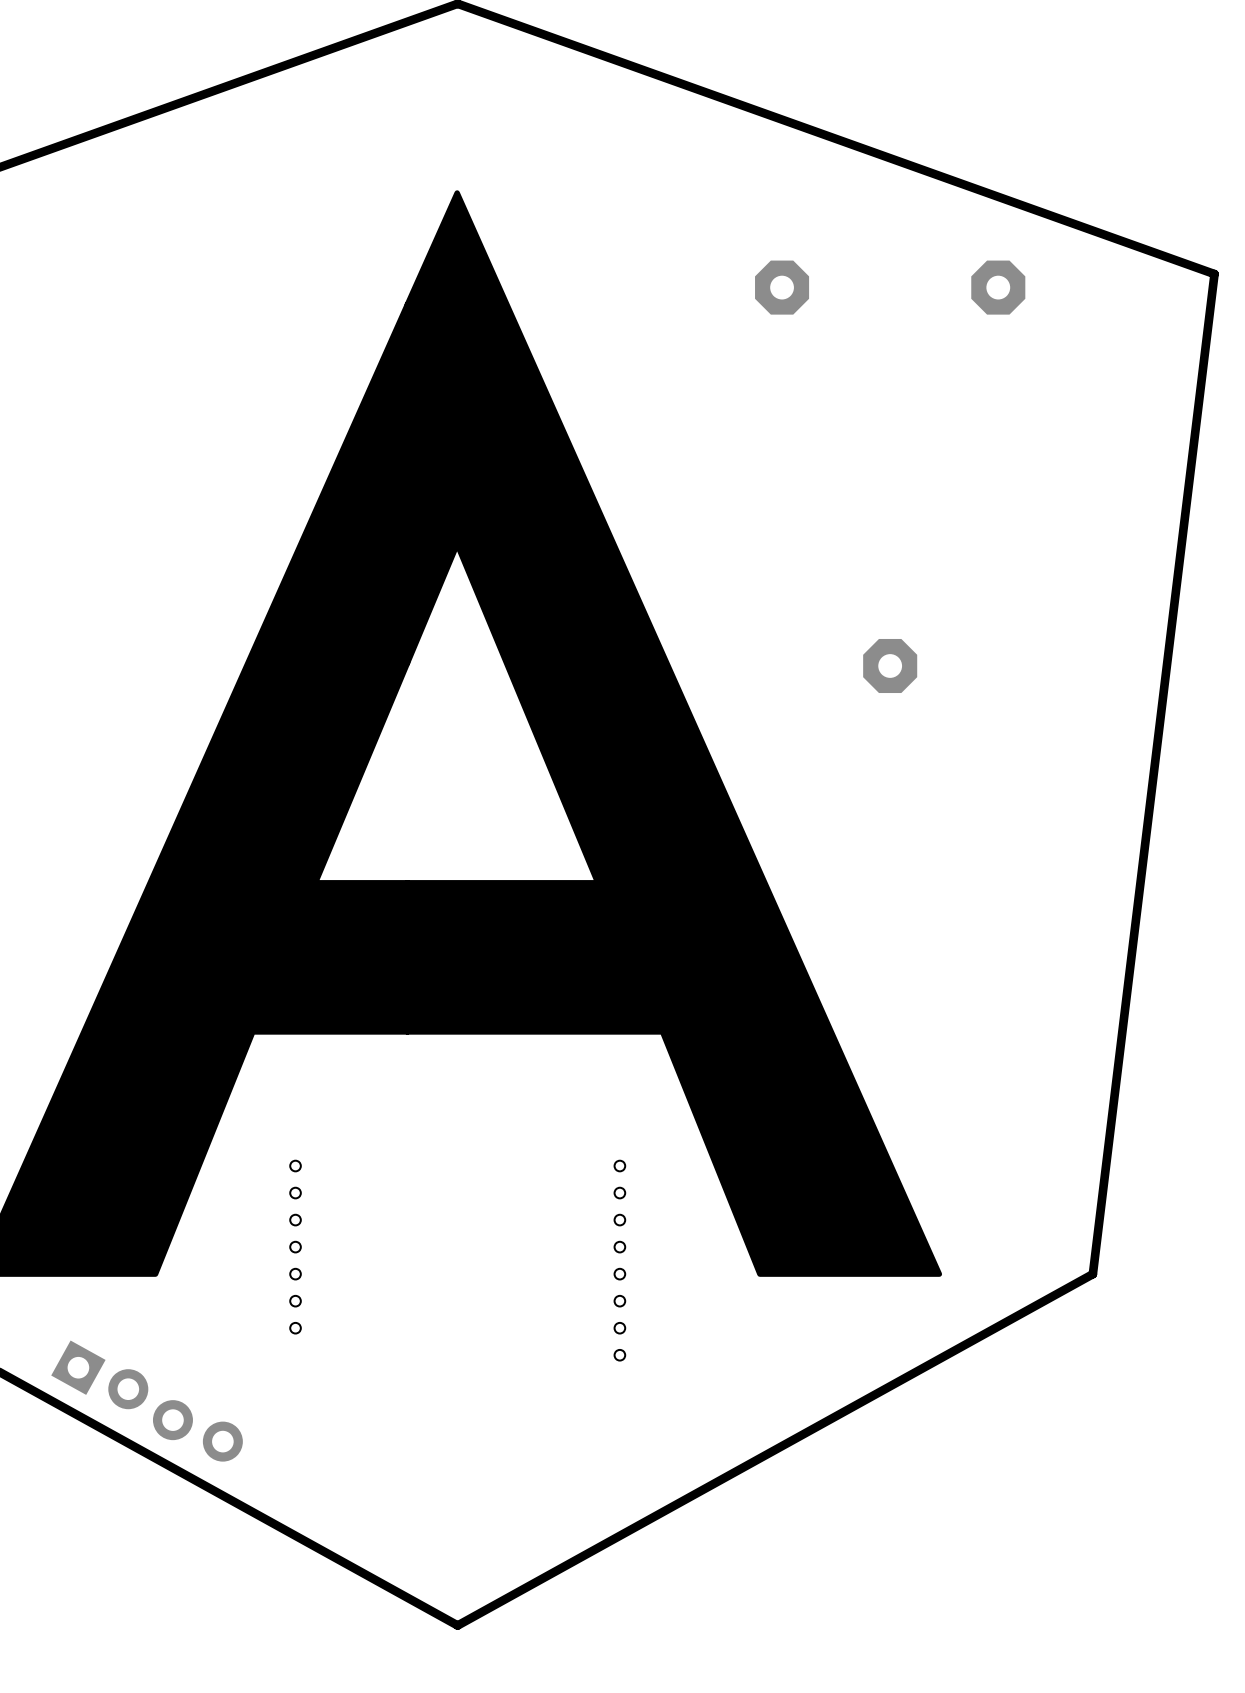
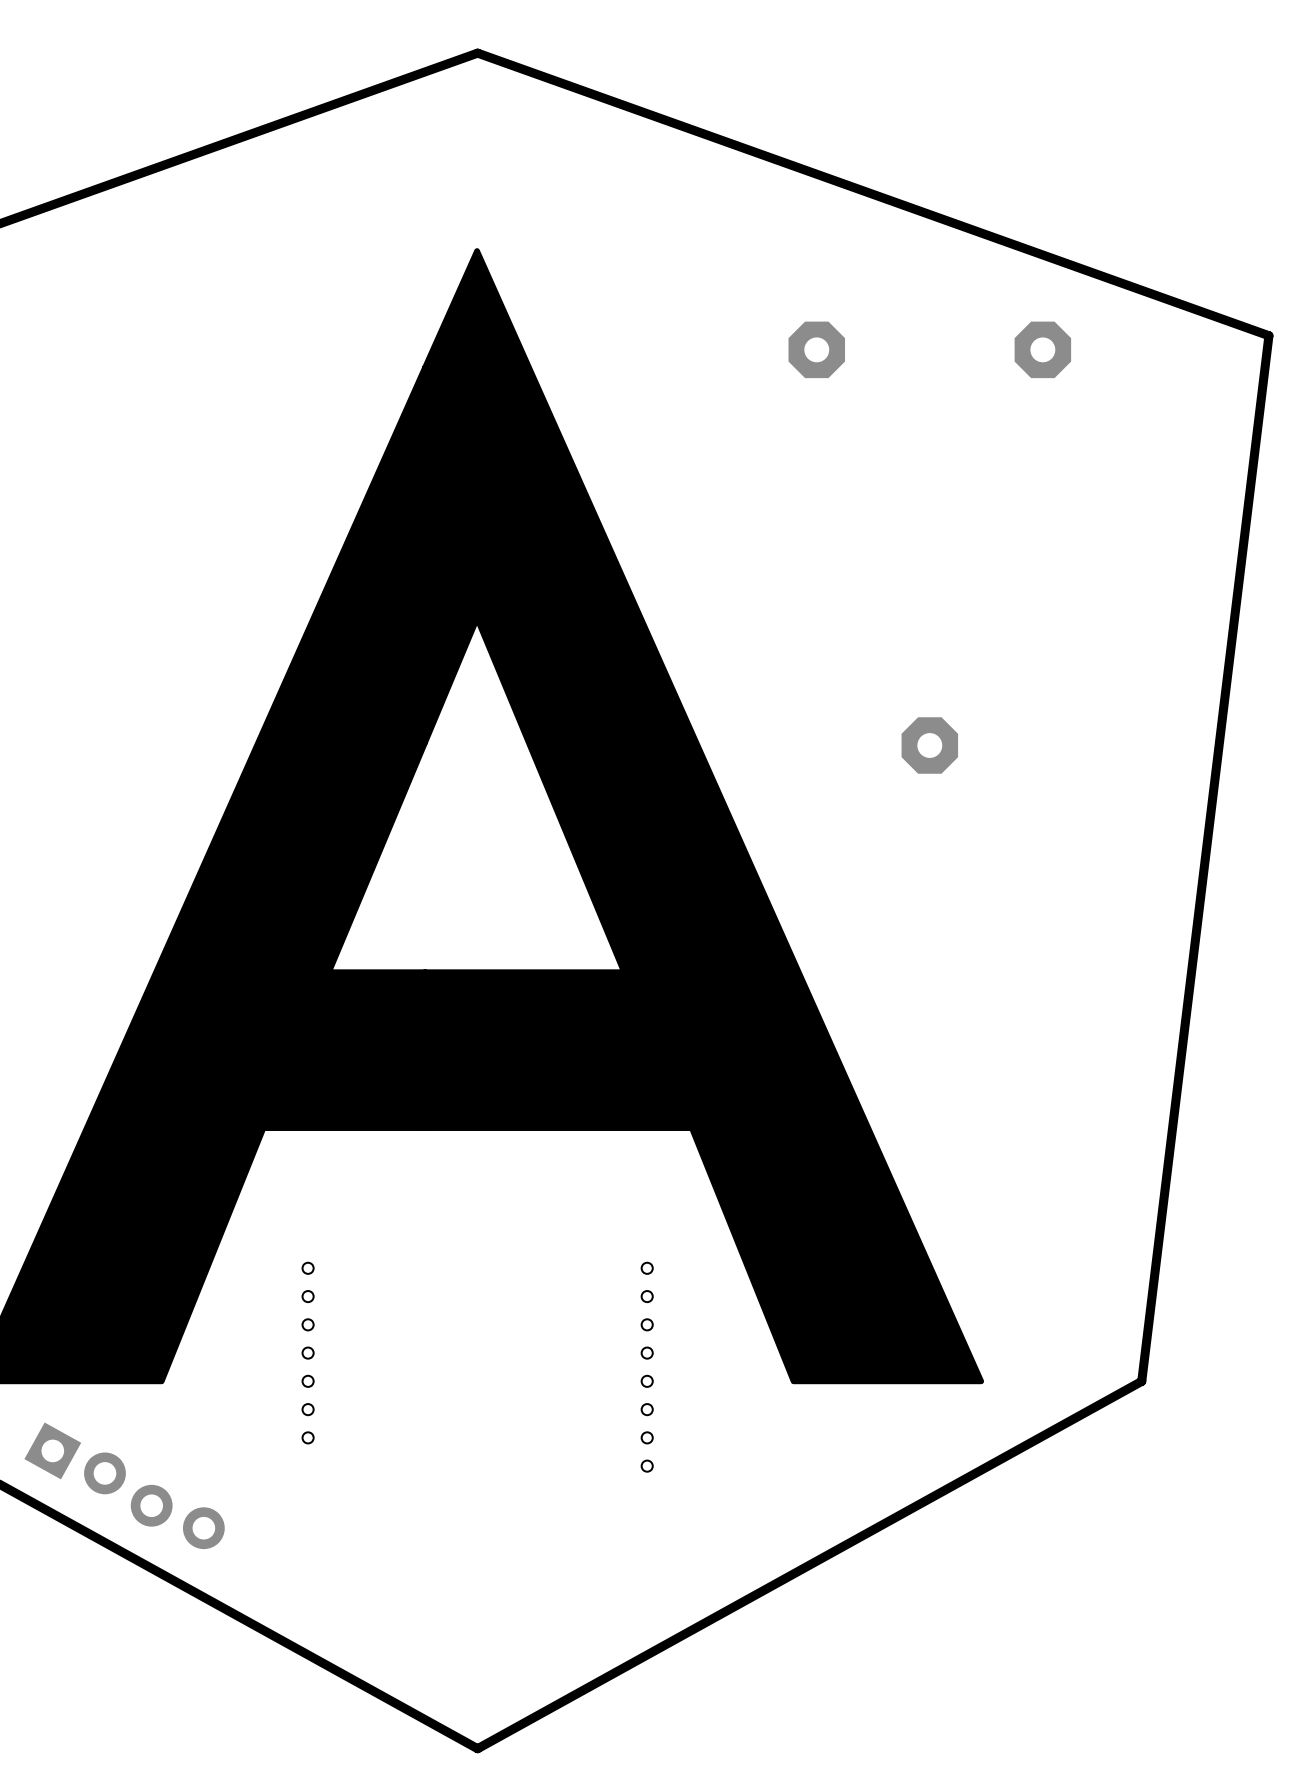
part position: (147, 1401) -> (124, 1485)

